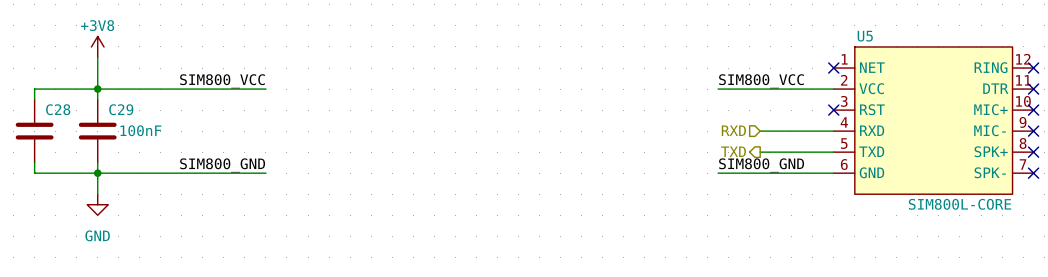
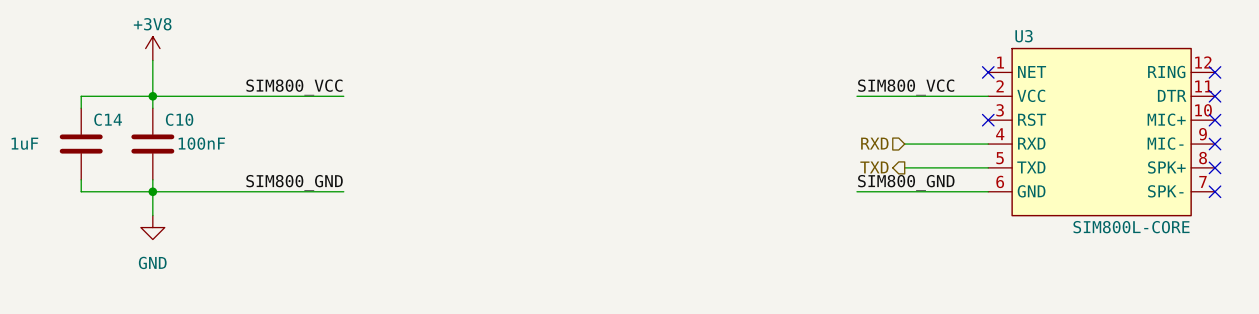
U5 name: U5 (865, 36) -> U3 (1024, 36)
C28 name: C28 (58, 109) -> C14 (108, 119)
C29 name: C29 (121, 109) -> C10 (179, 119)

